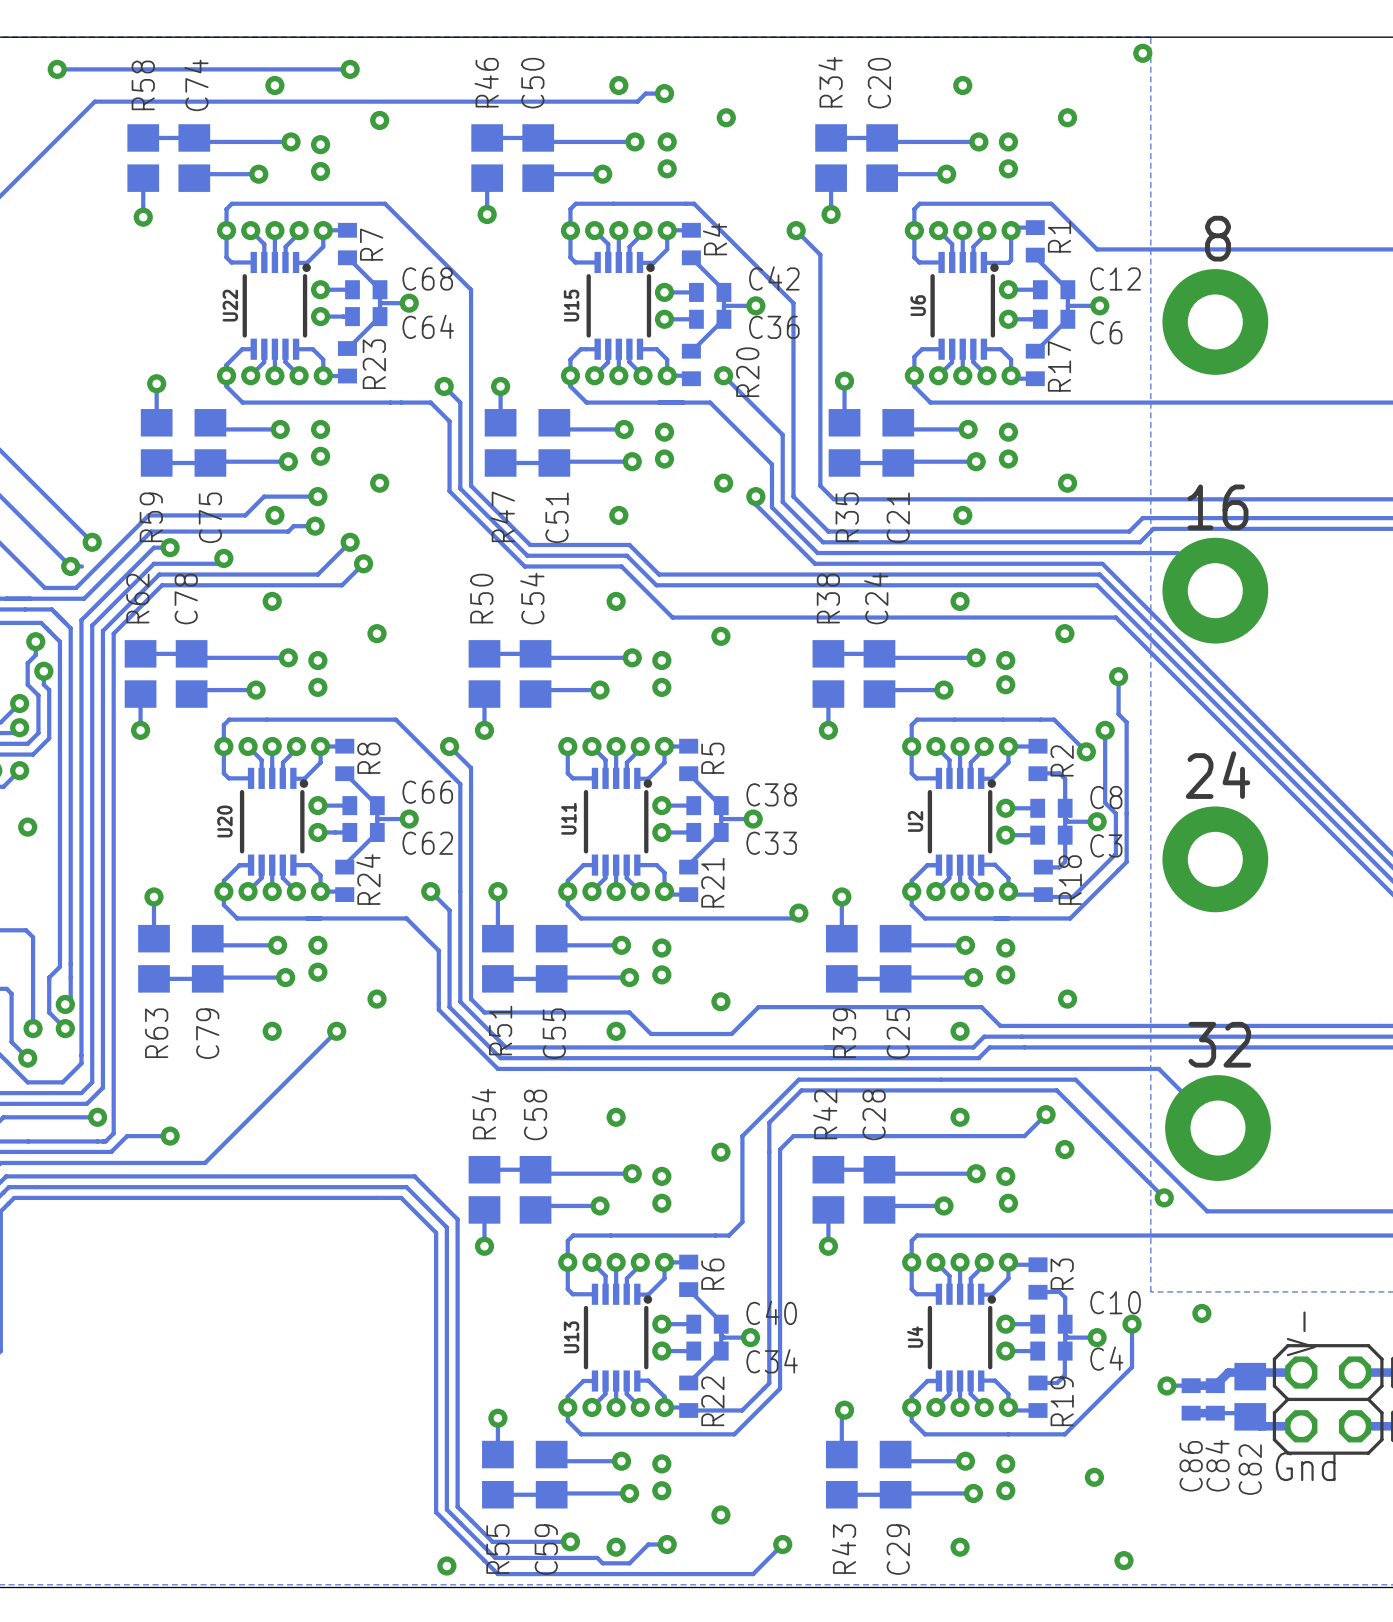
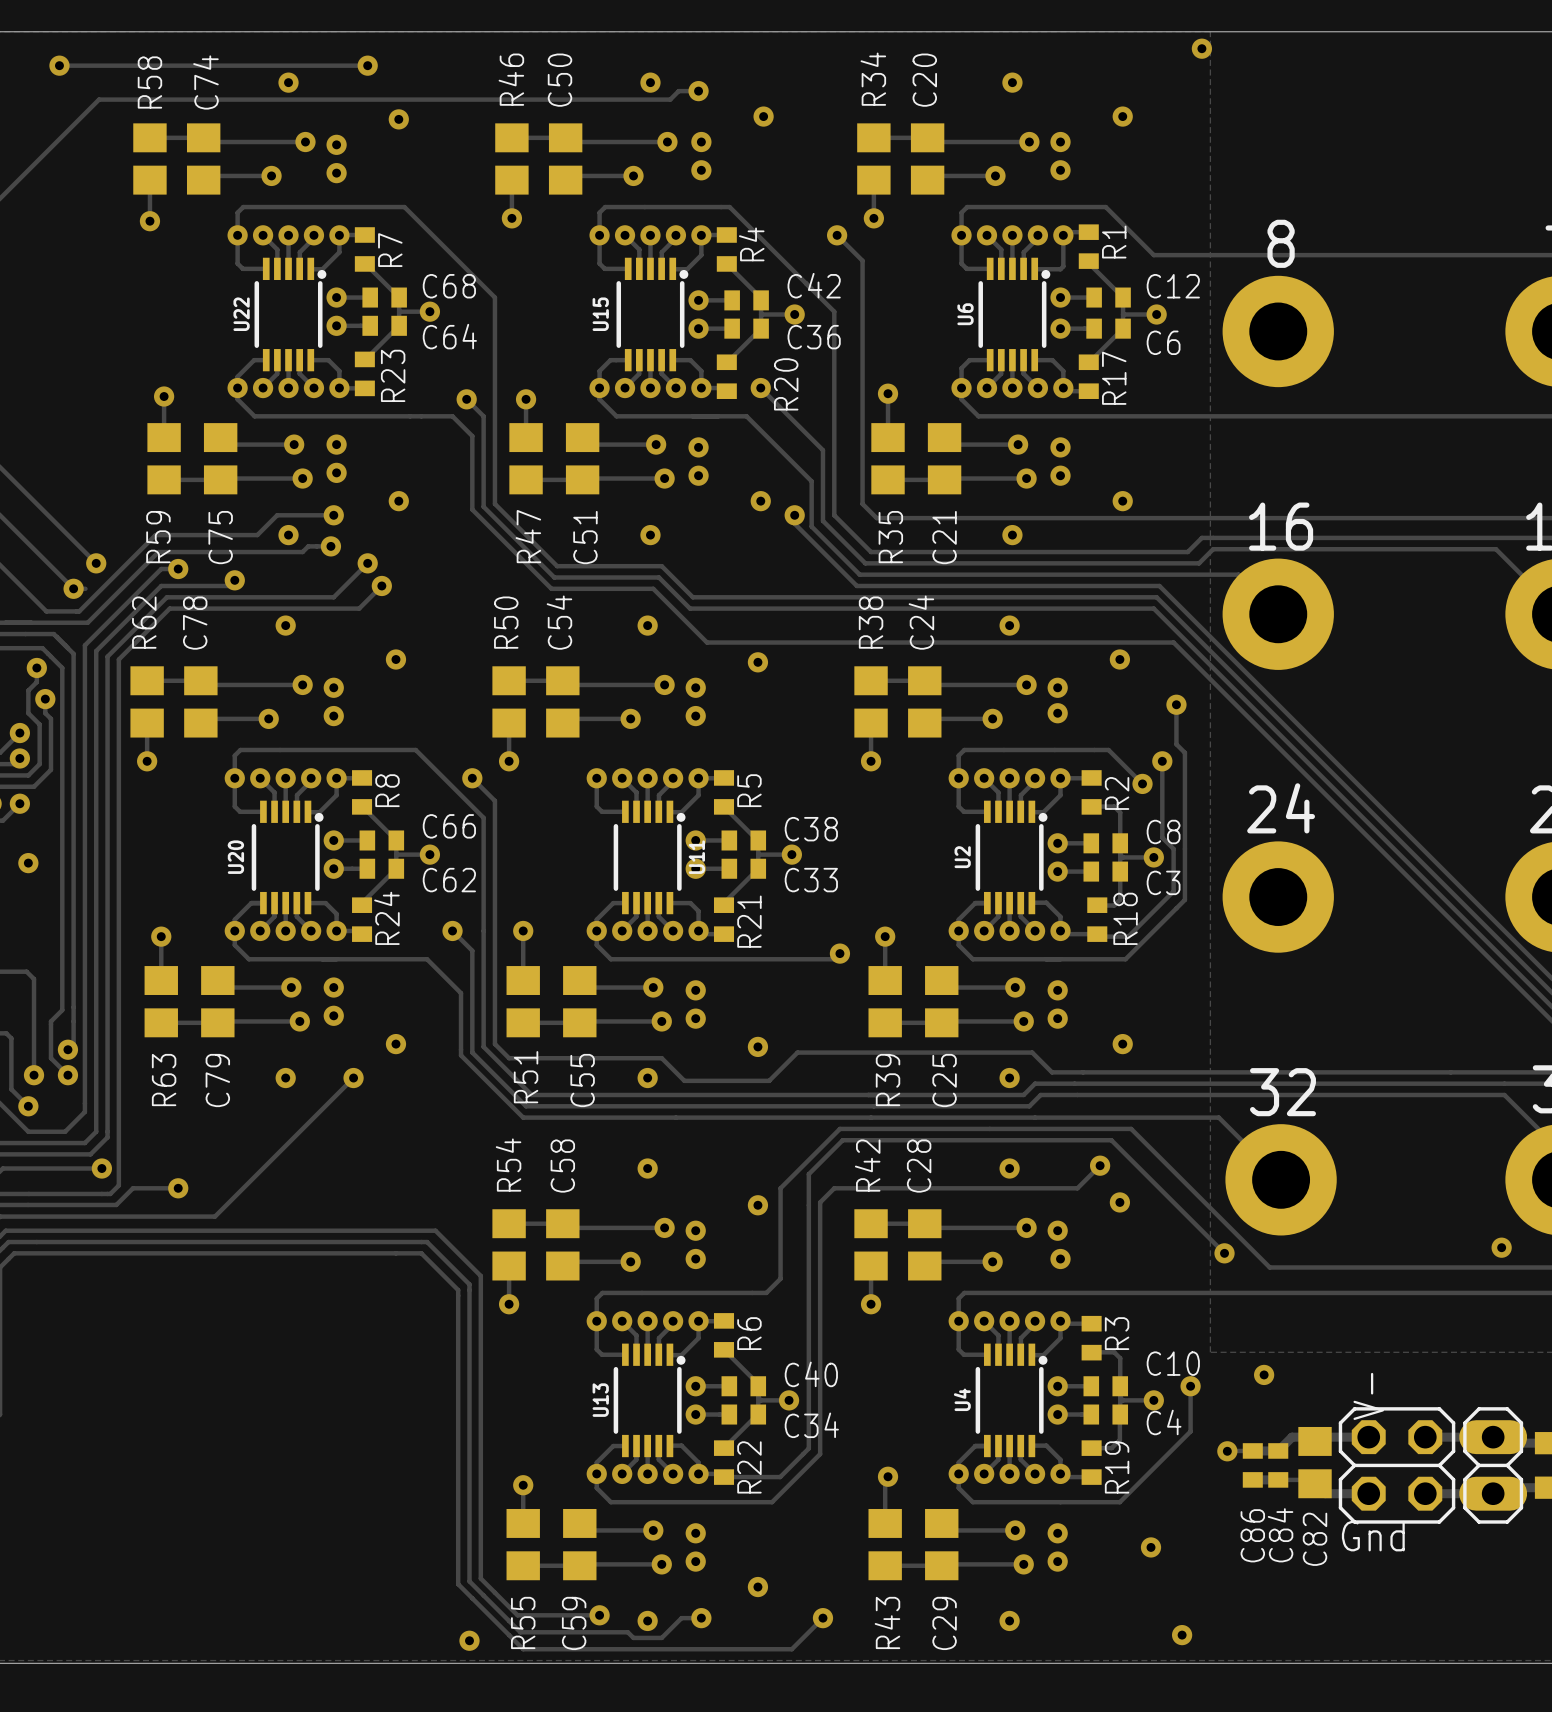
U11 name position: U11 (568, 818) -> U11 (696, 857)

